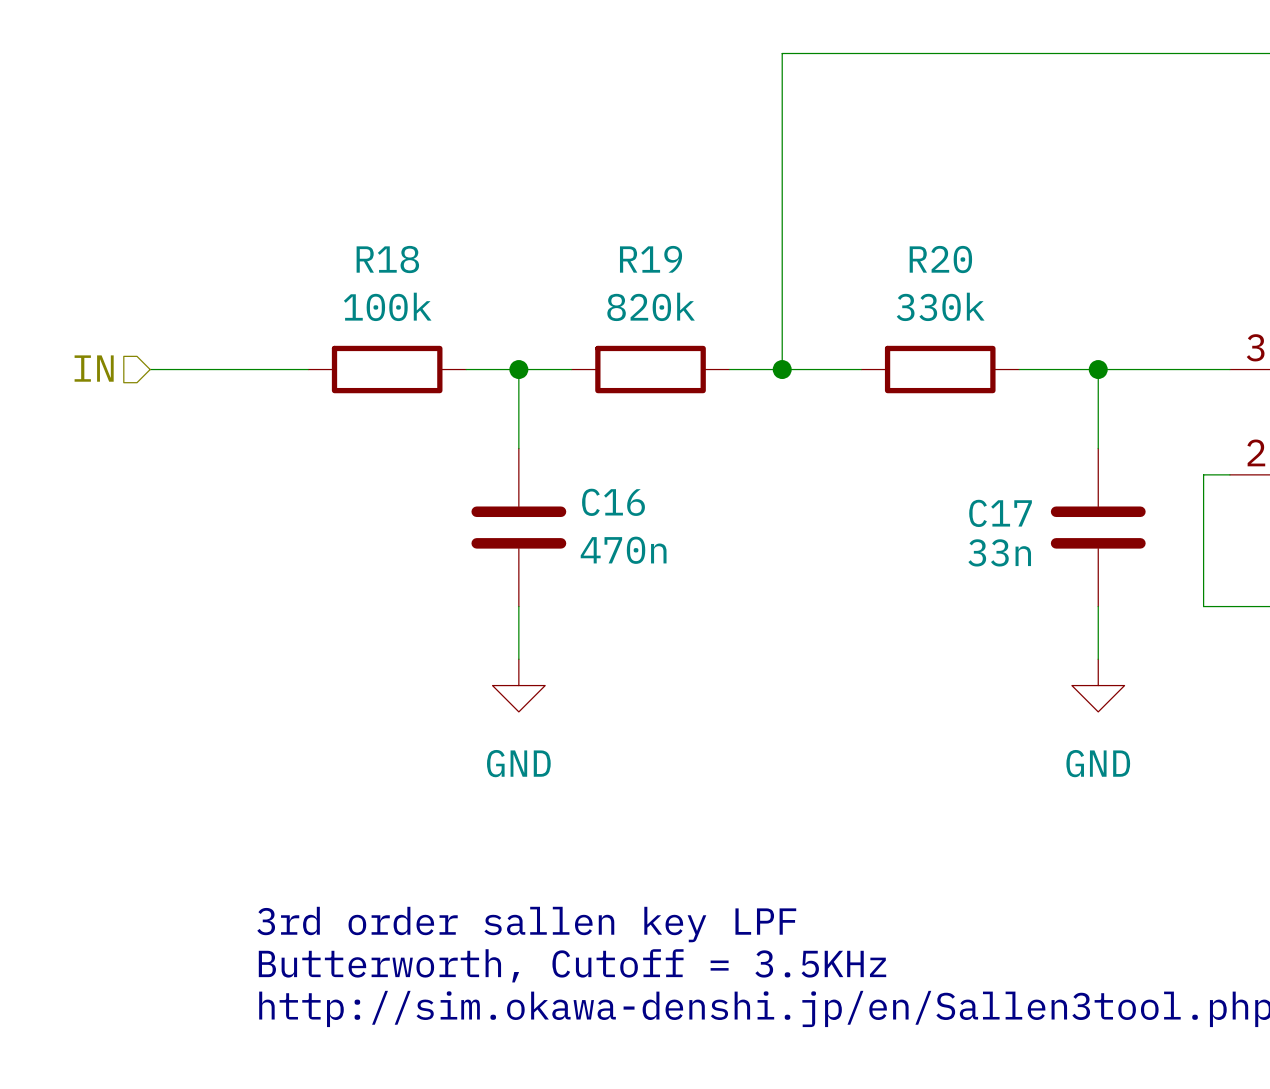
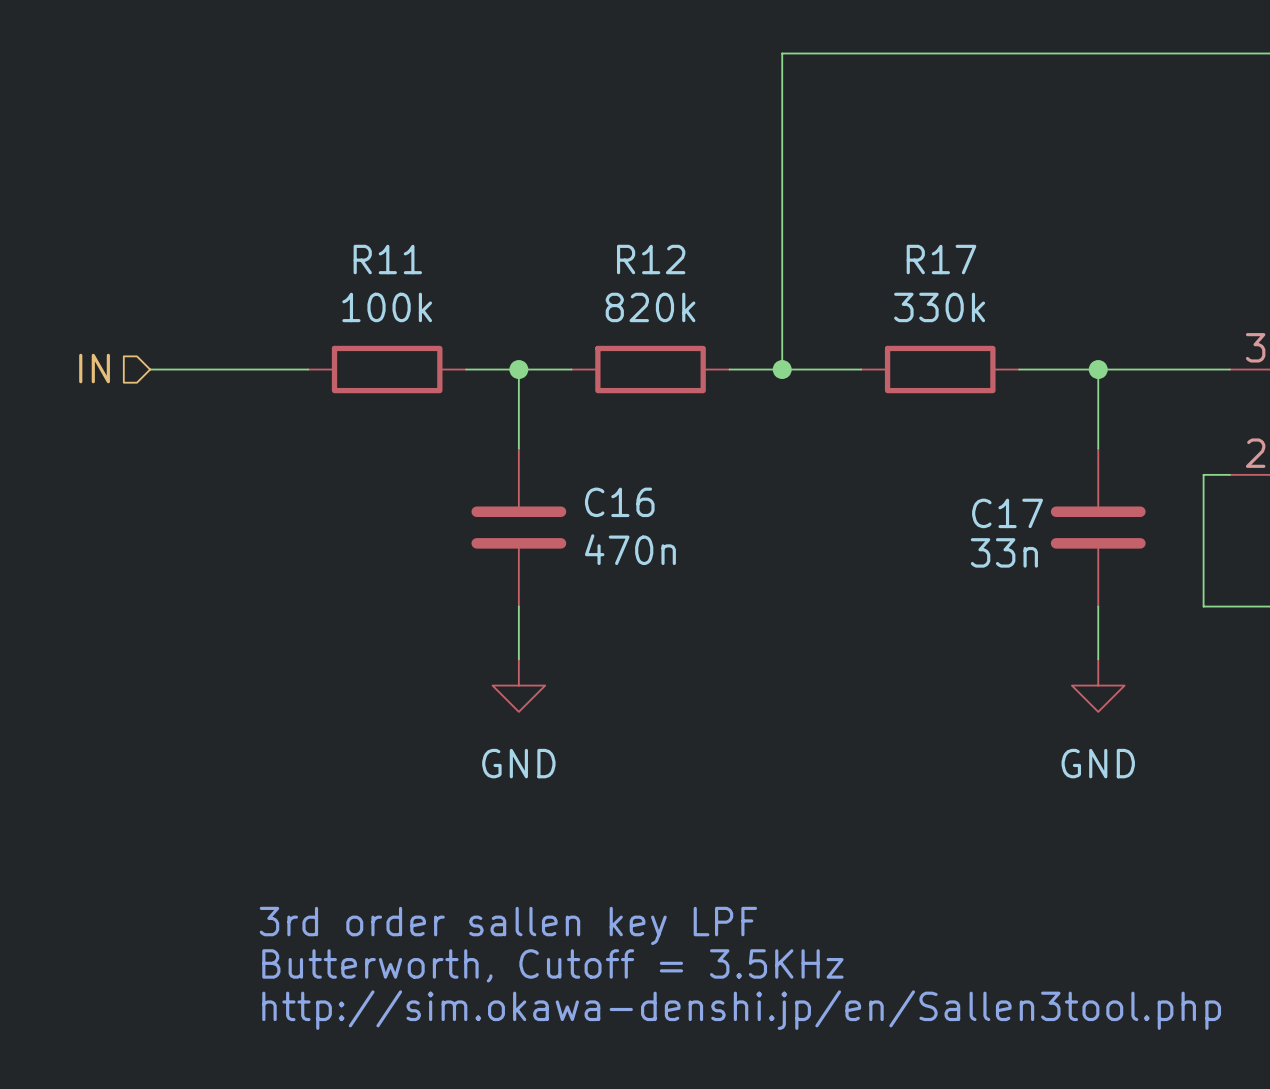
R18 name: R18 (387, 259) -> R11 (387, 259)
R19 name: R19 (651, 259) -> R12 (651, 259)
R20 name: R20 (940, 259) -> R17 (941, 259)

